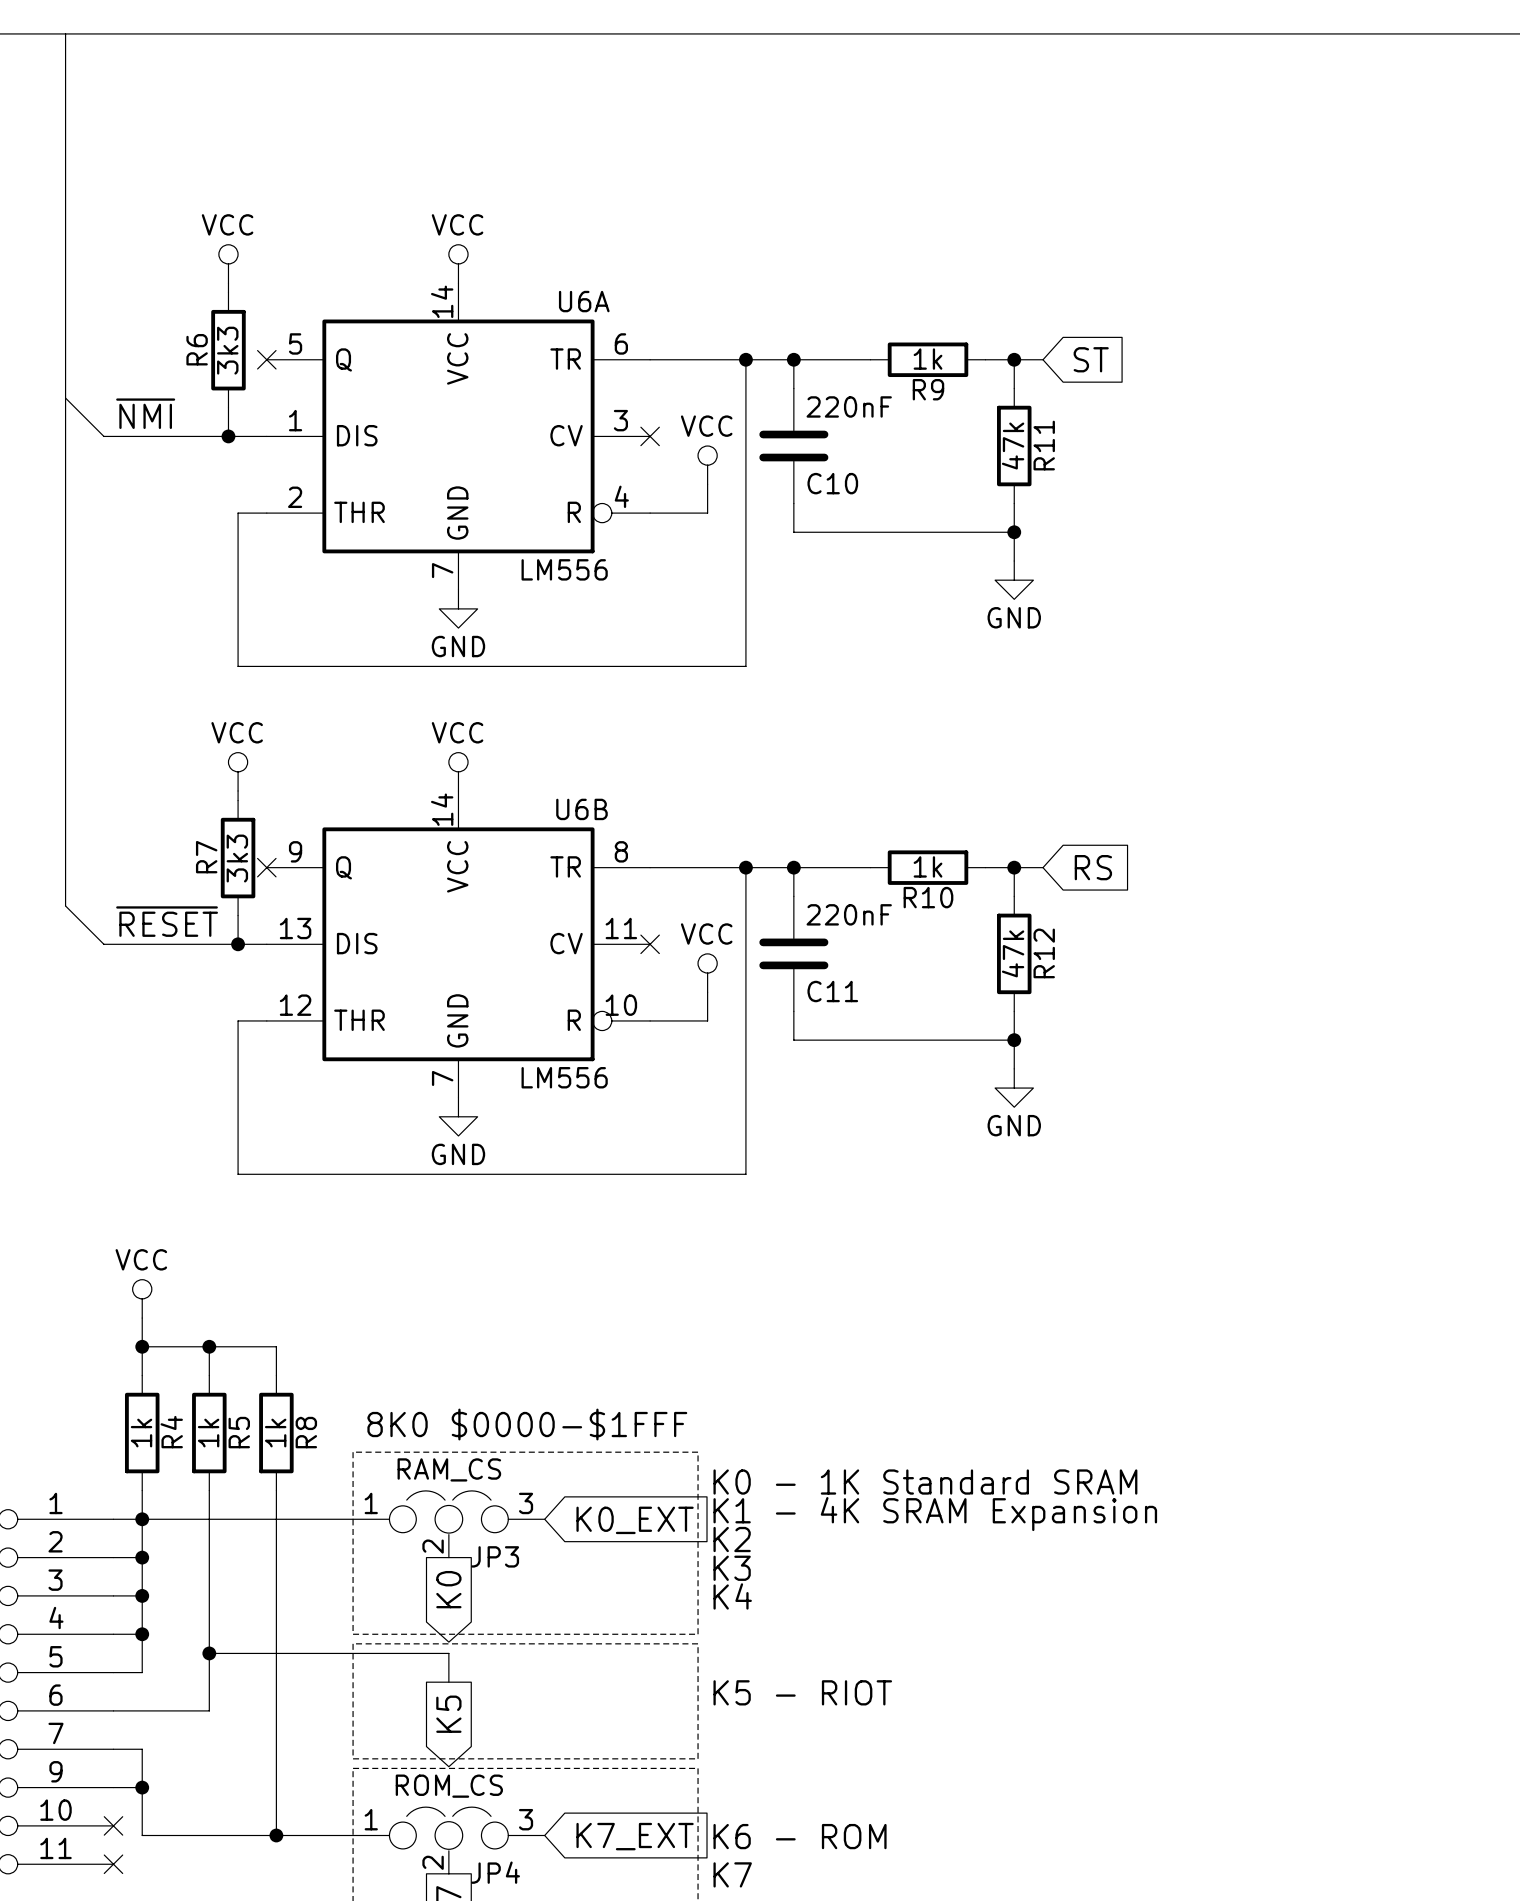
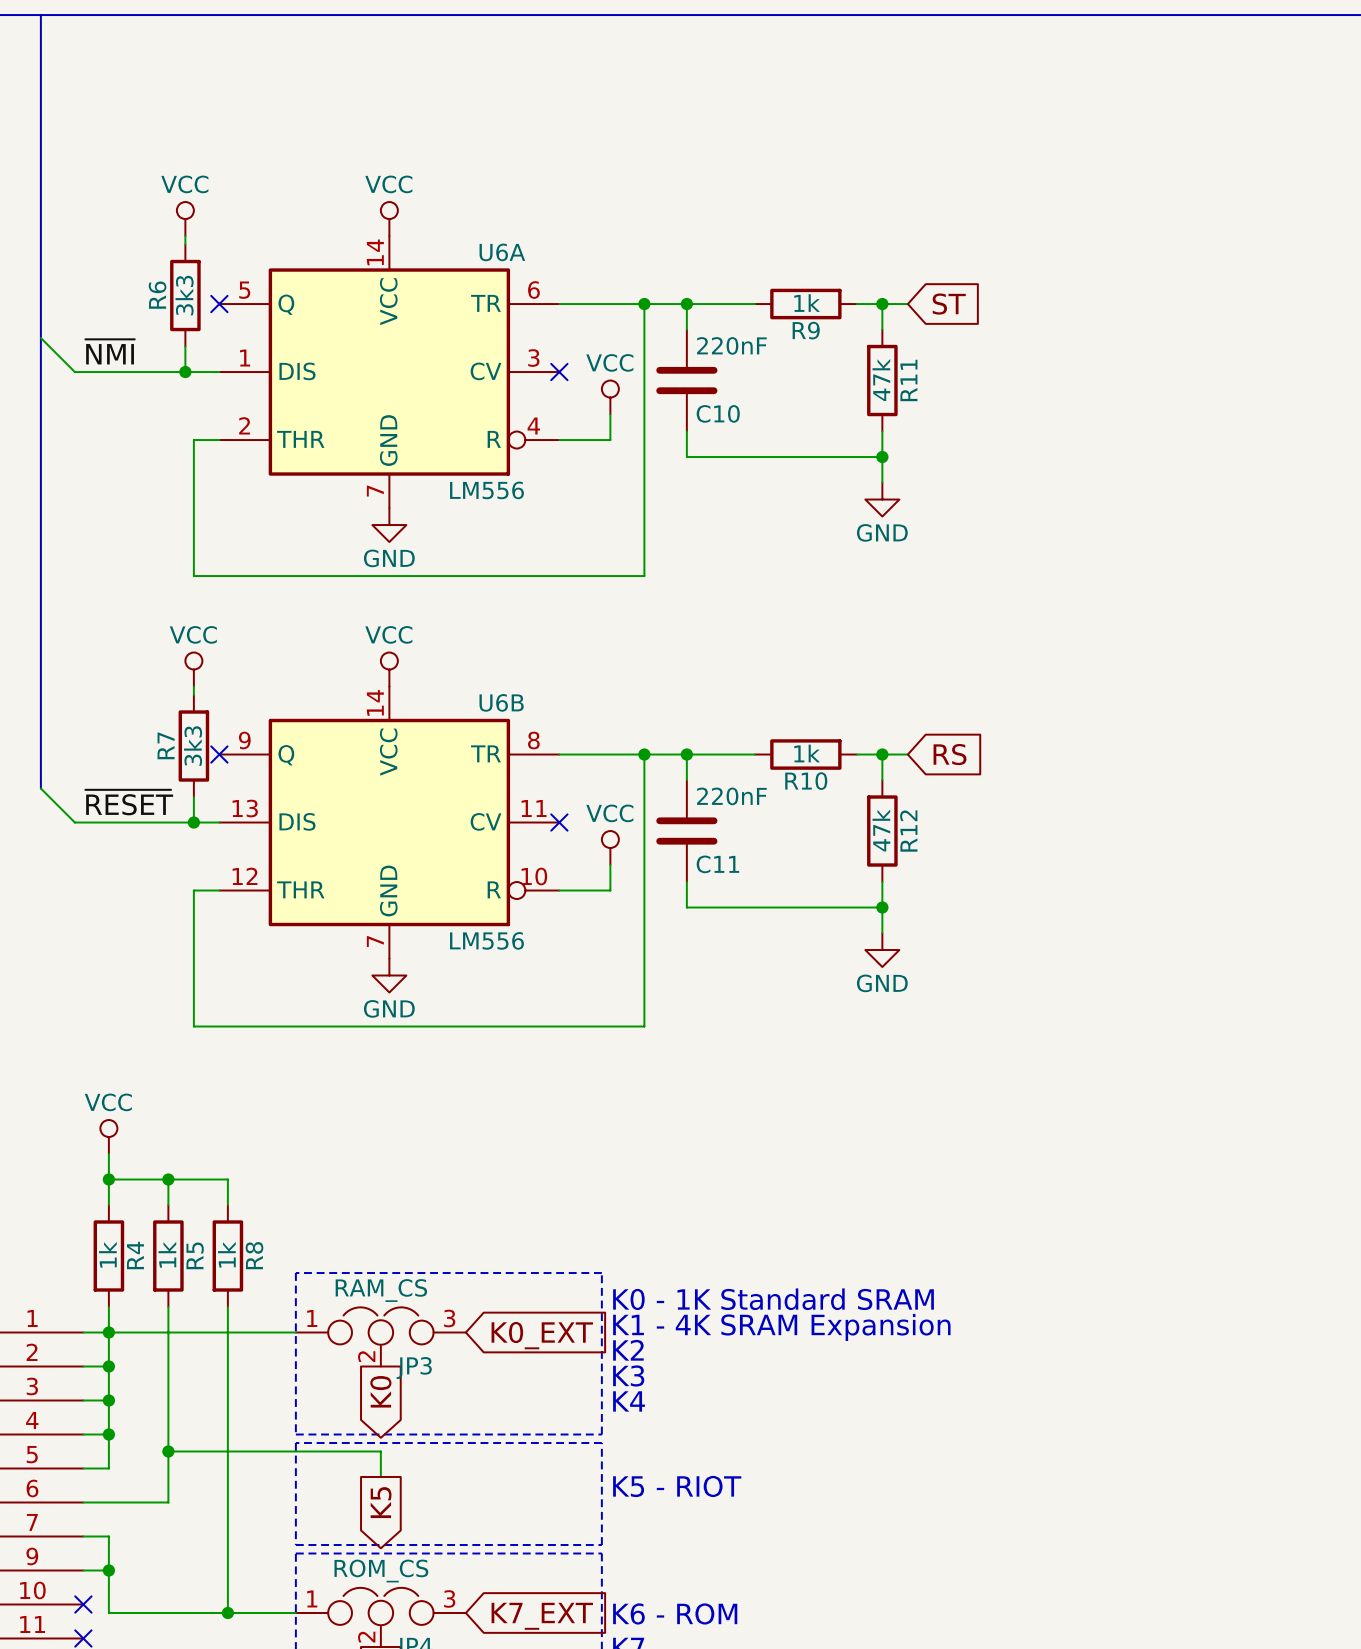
text: 8K0 $0000-$1FFF (527, 1424) -> none

